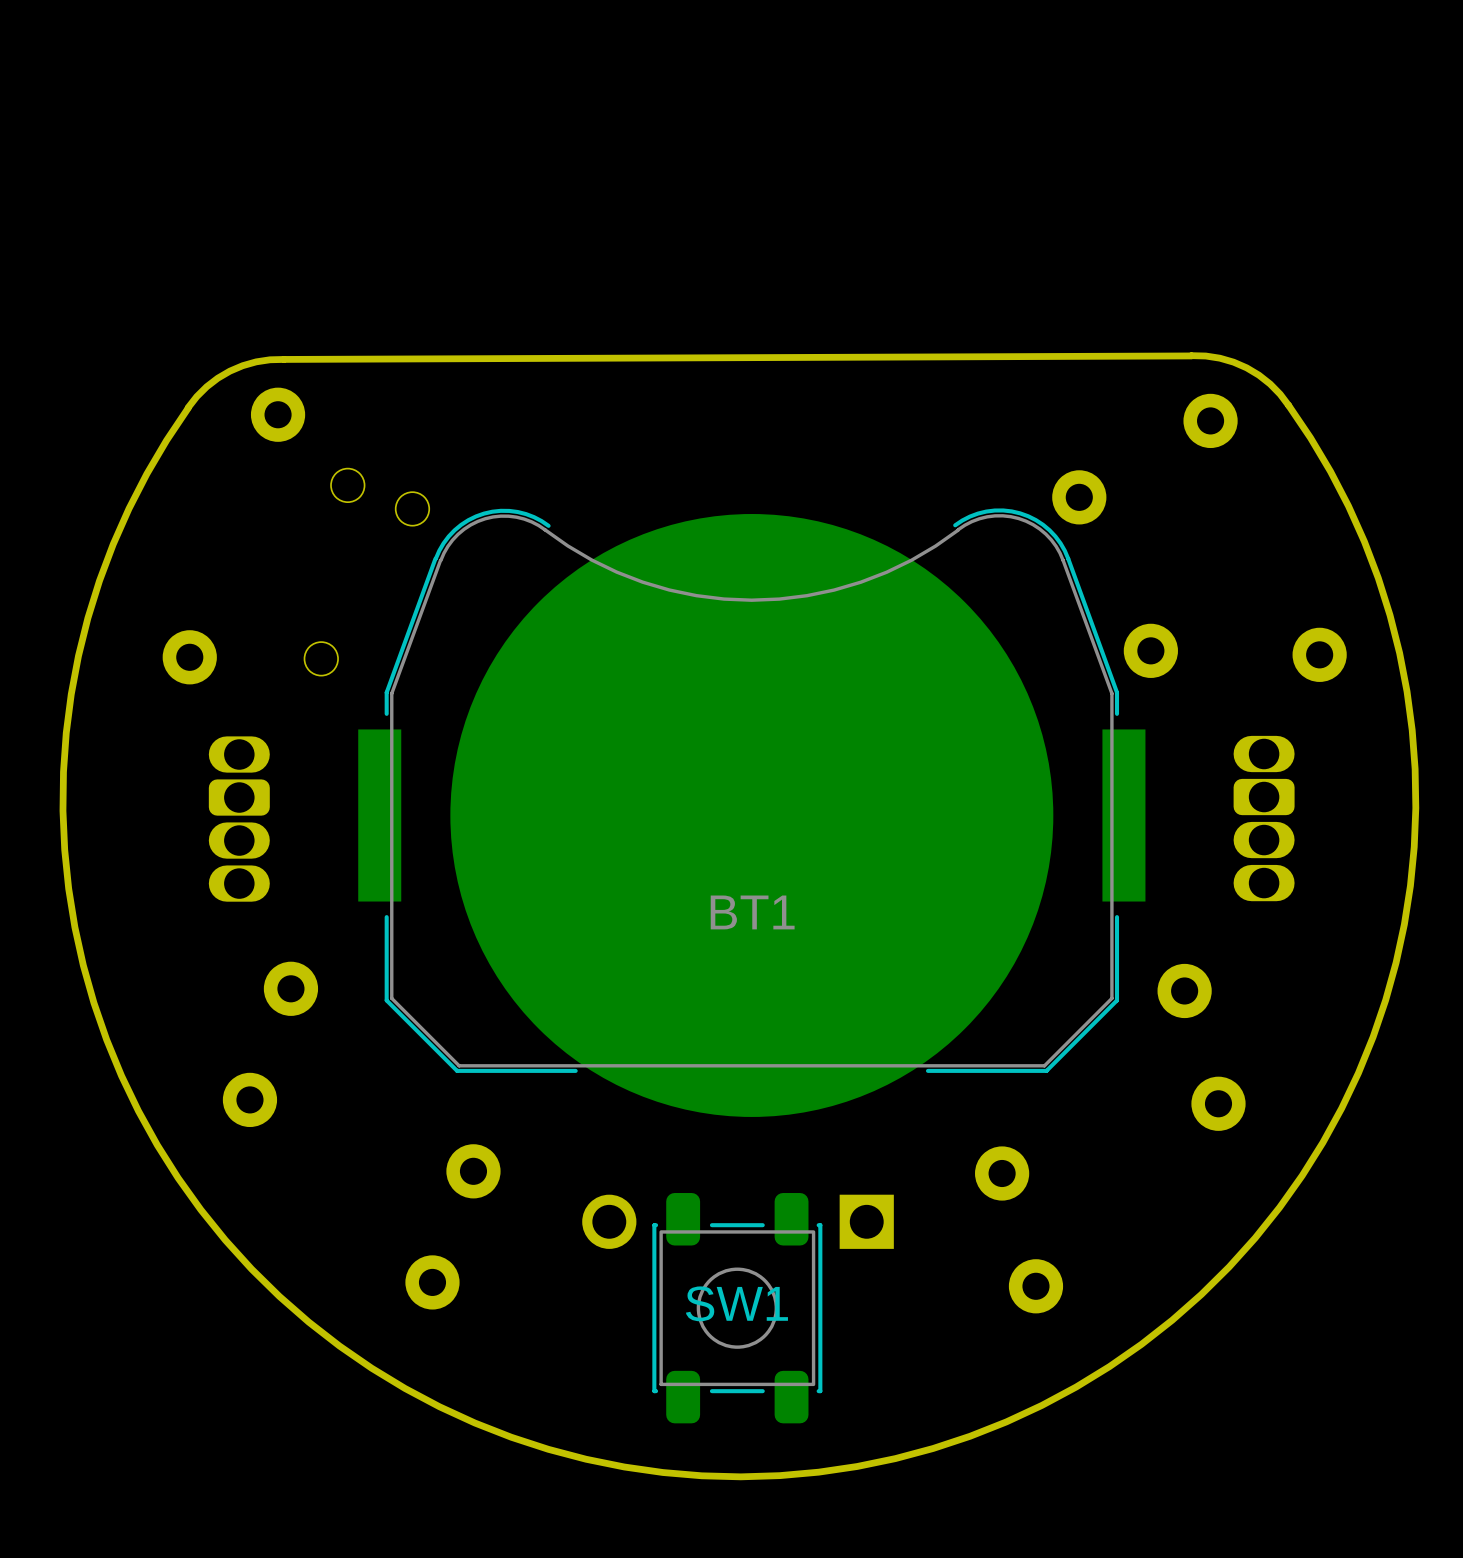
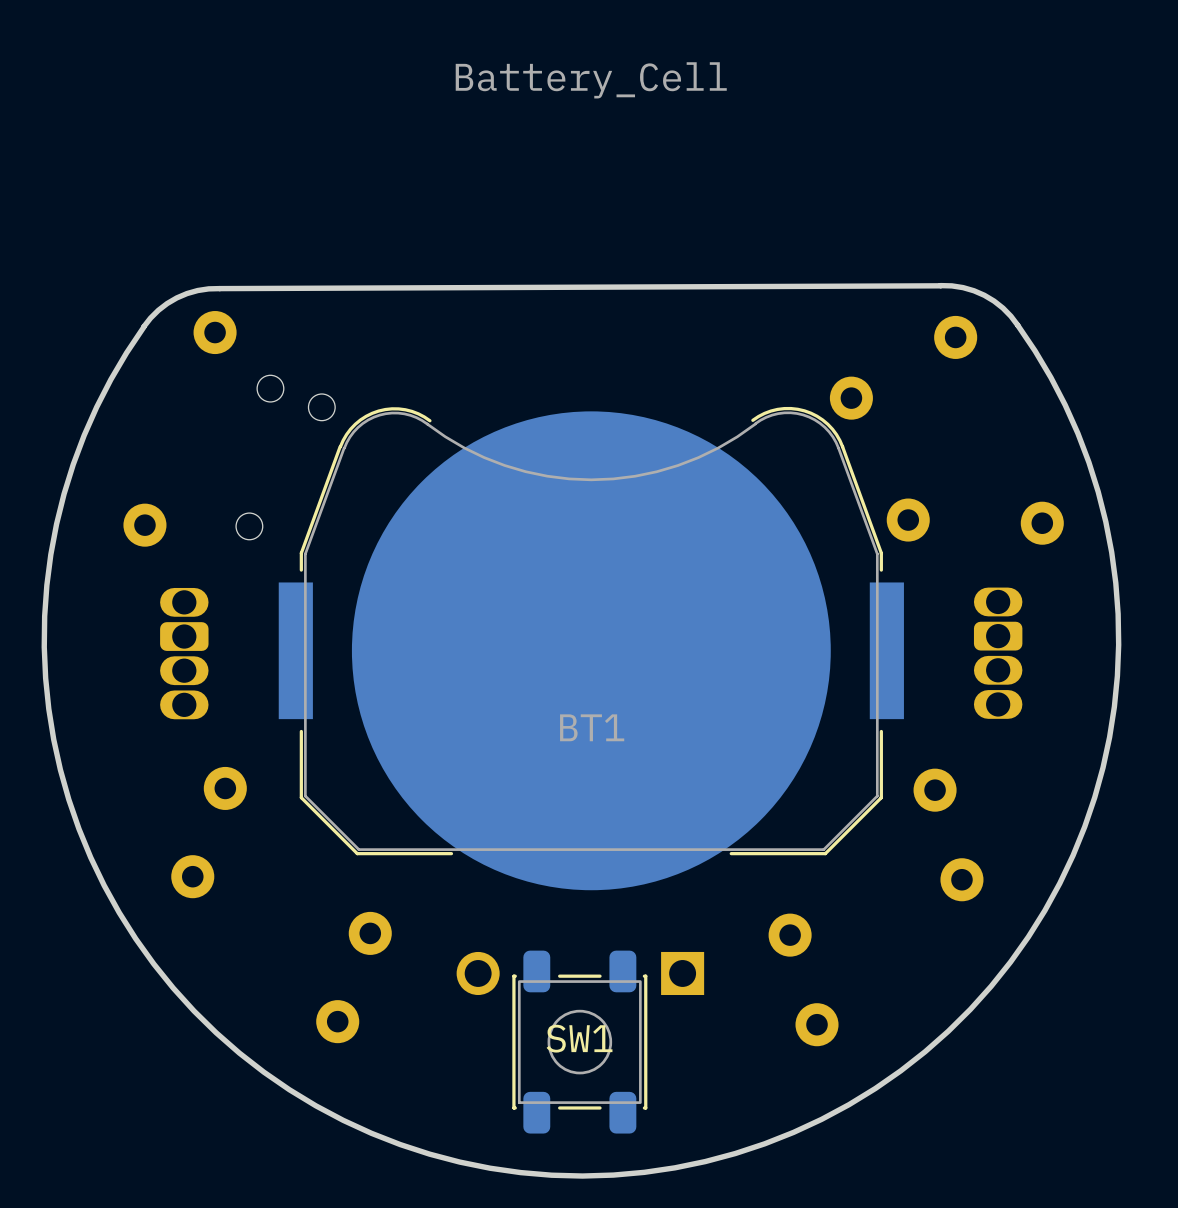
BT1 value: none -> Battery_Cell (591, 80)

